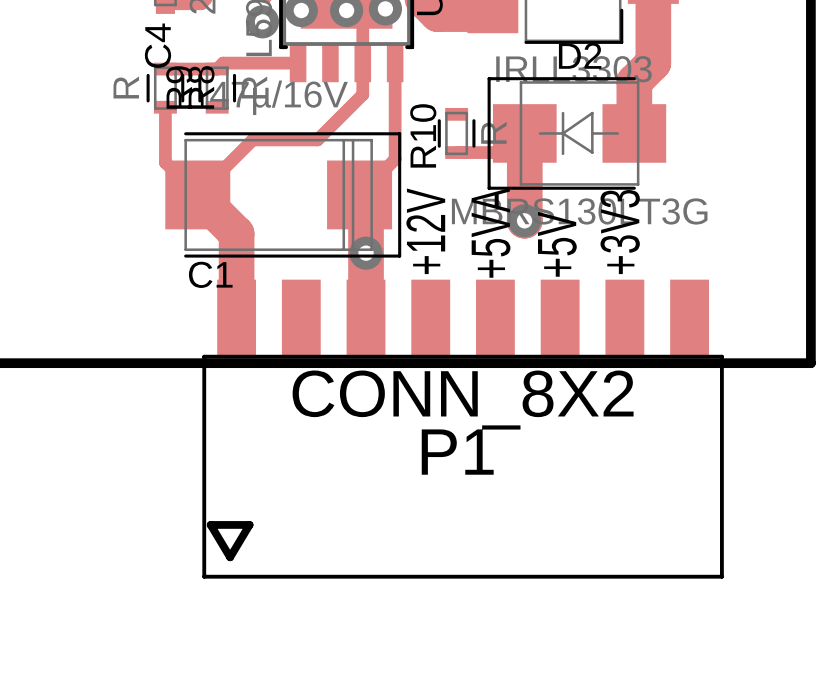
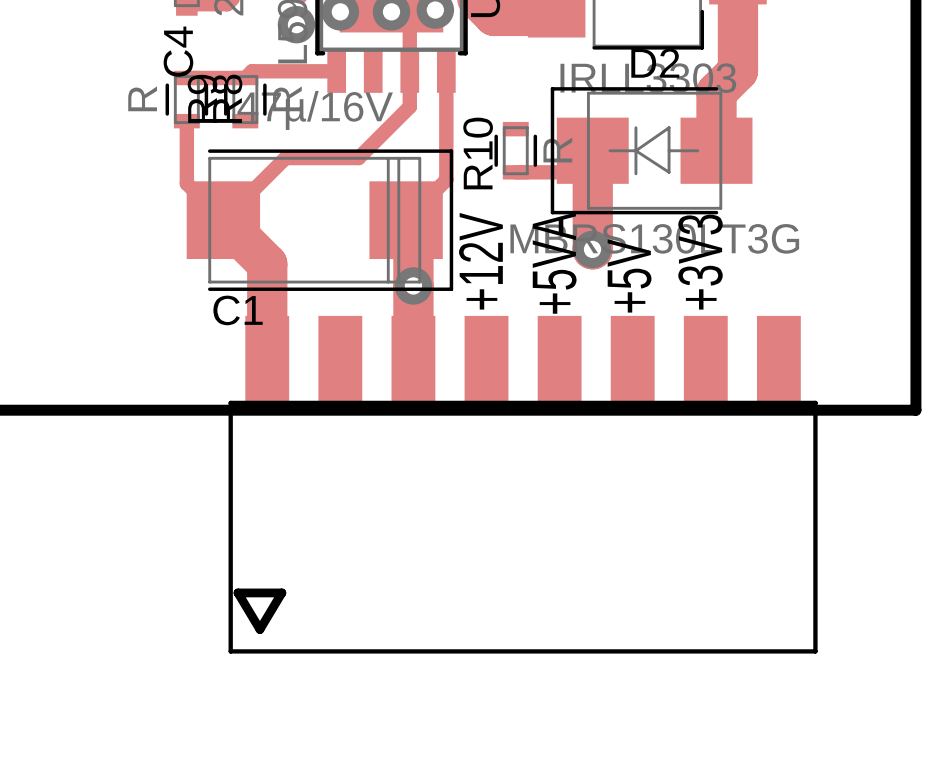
P1 value: CONN_8X2 (463, 400) -> none
P1 name: P1 (457, 452) -> none

